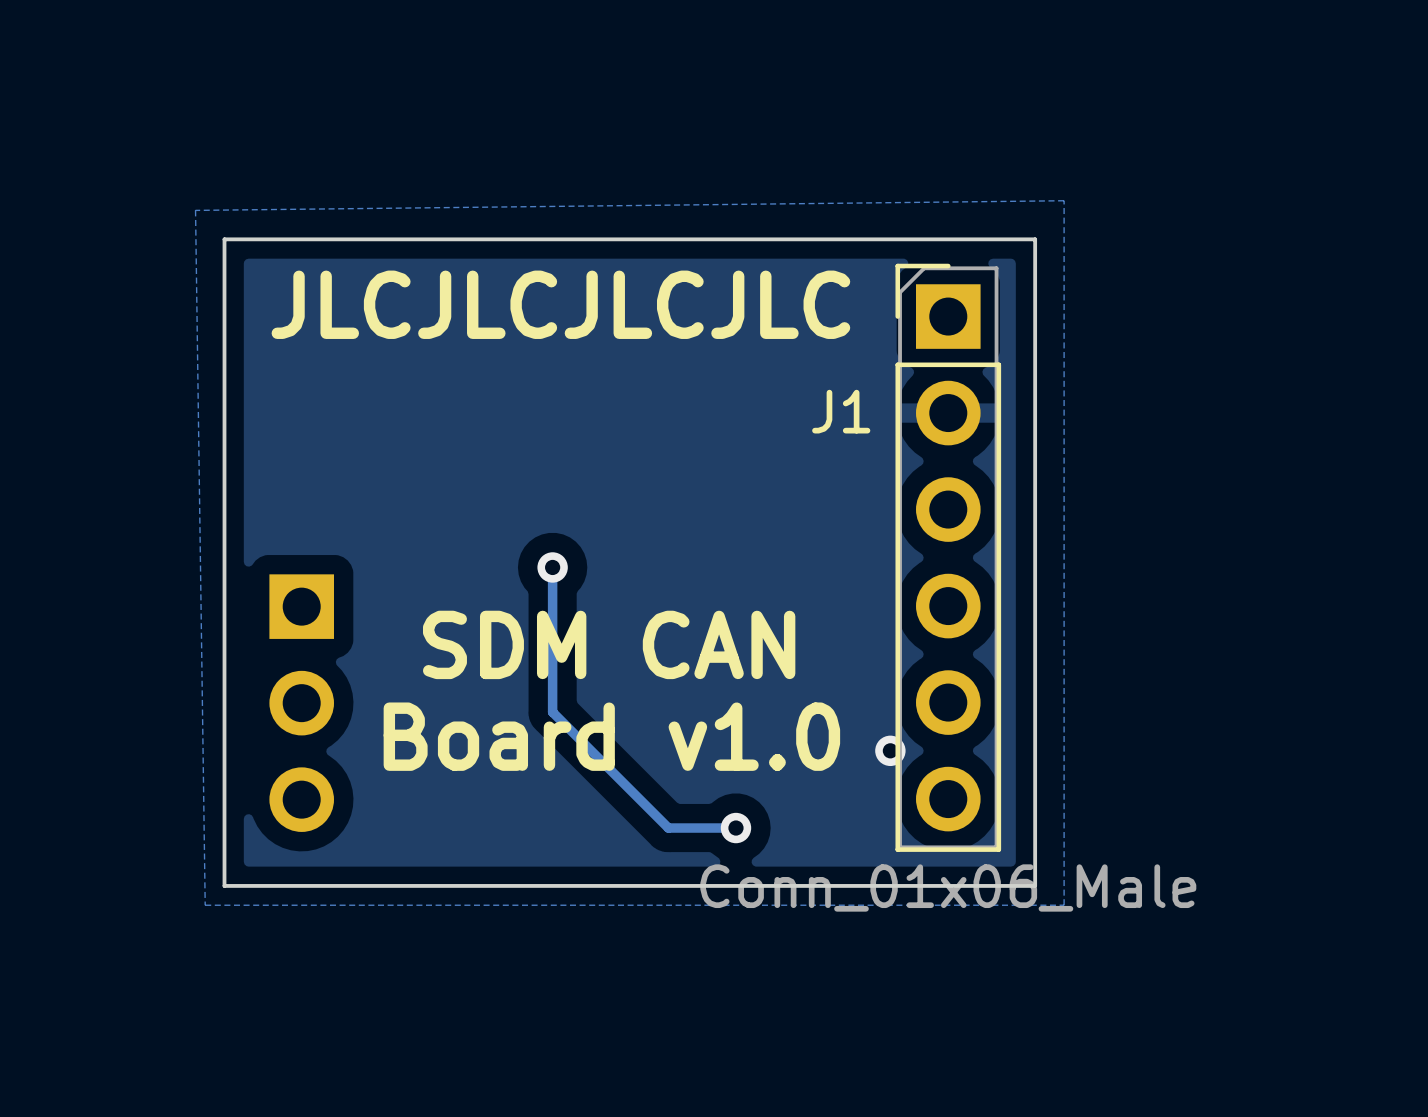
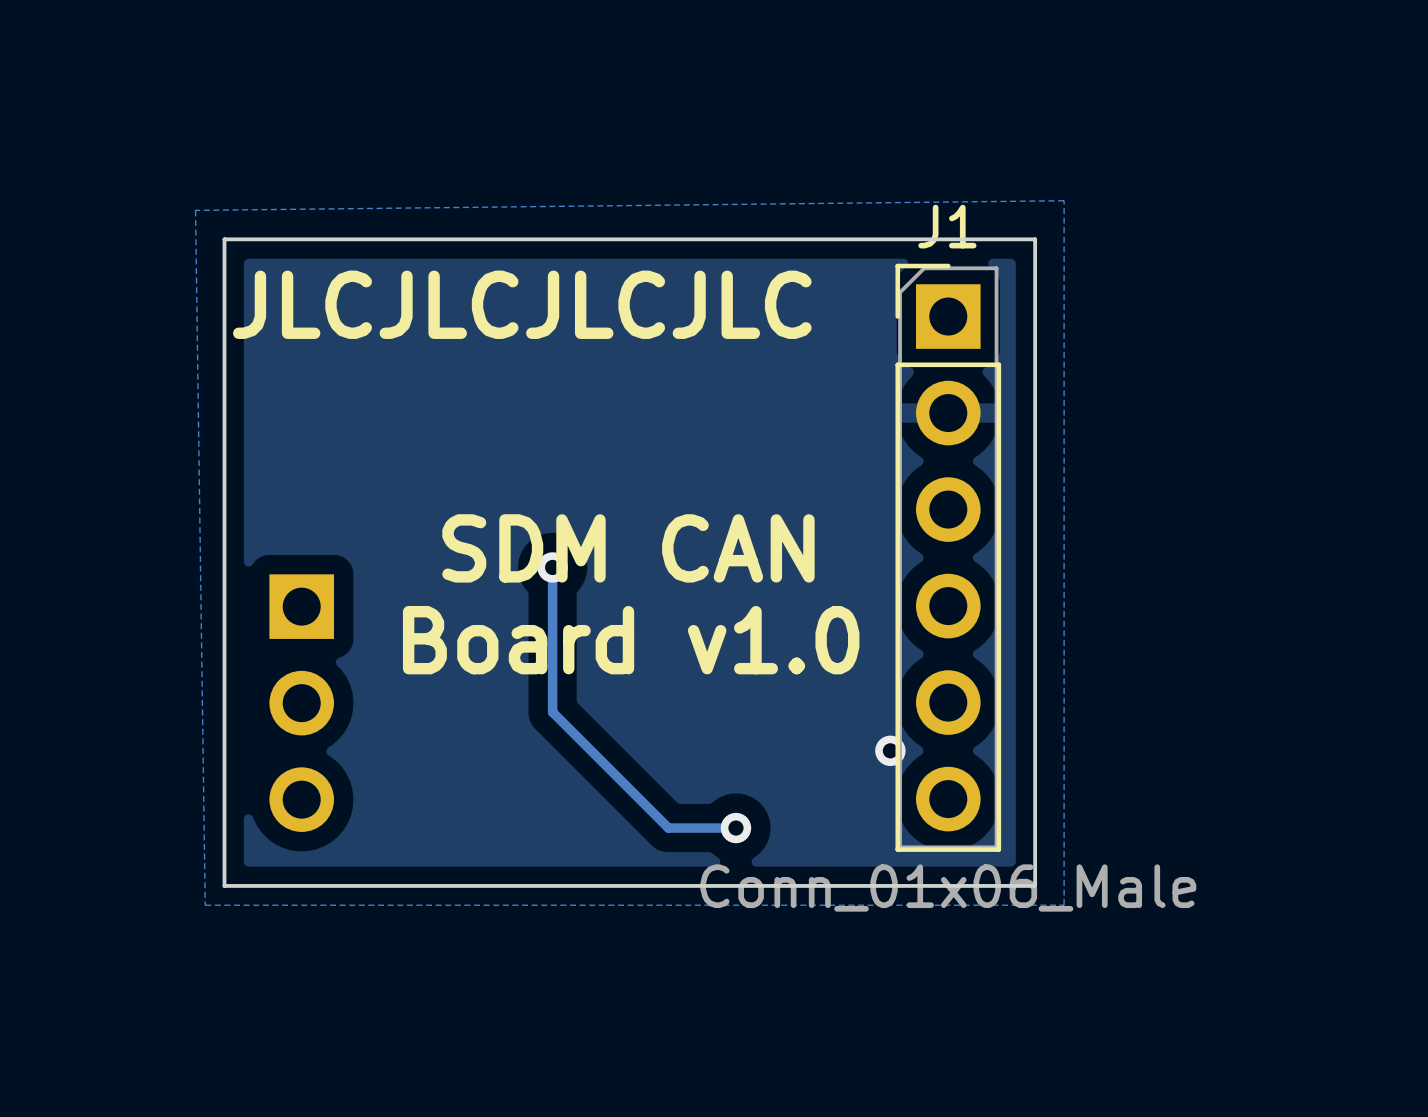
text position: JLCJLCJLCJLC (560, 304) -> JLCJLCJLCJLC (522, 304)
J1 name position: J1 (841, 411) -> J1 (947, 226)
text position: SDM CAN (609, 644) -> SDM CAN (628, 548)
text position: Board v1.0 (611, 736) -> Board v1.0 (631, 640)

